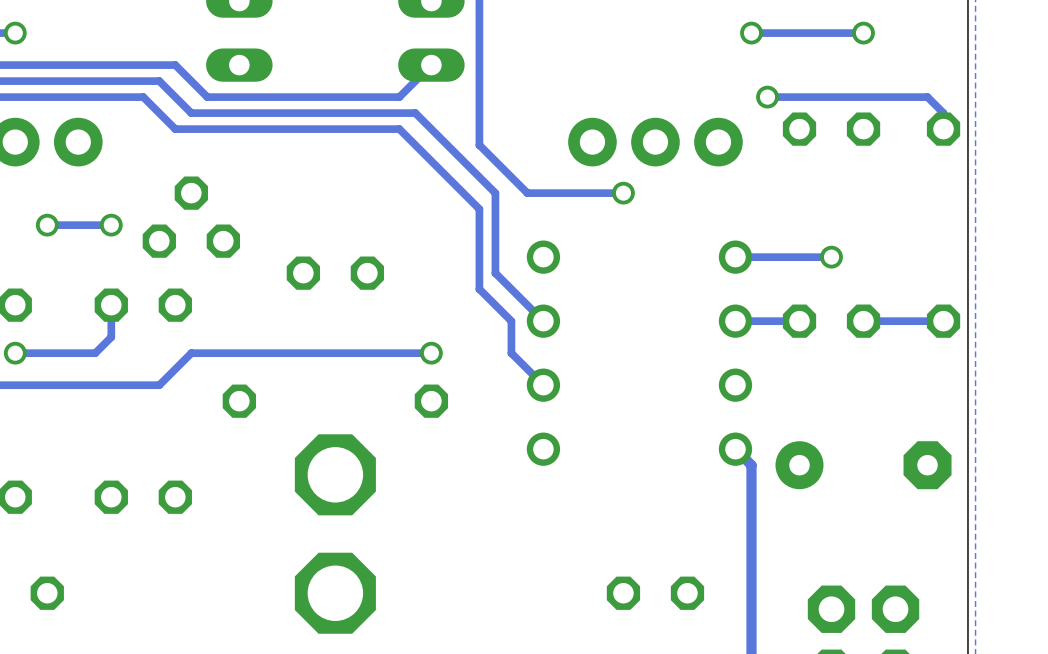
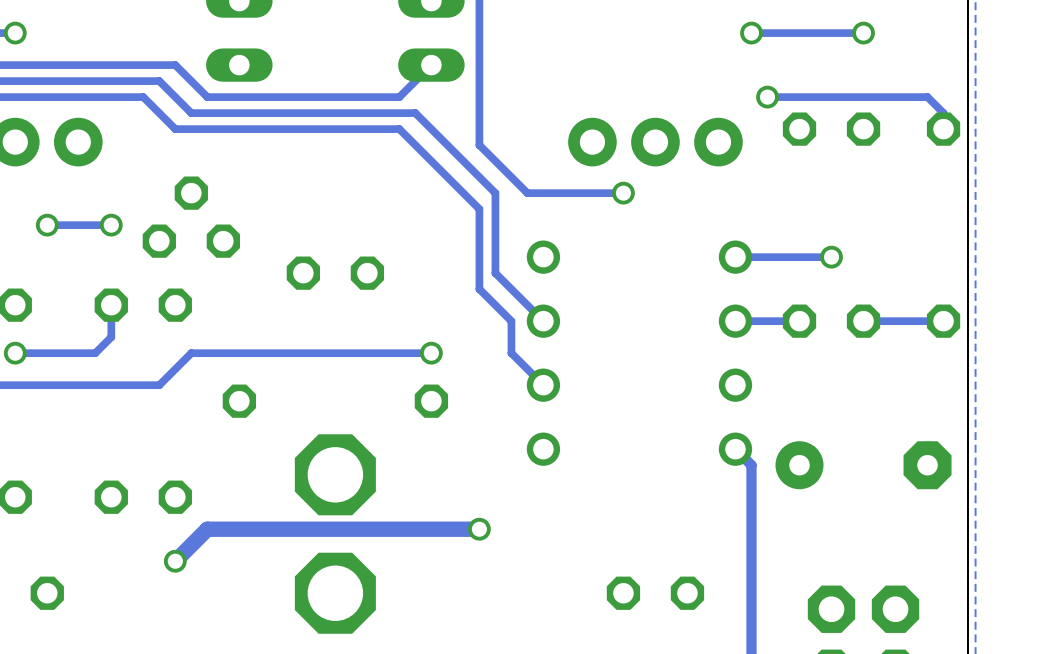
track: none -> (479, 529) (207, 529) (175, 561)
via: none -> (479, 529)
via: none -> (175, 561)

